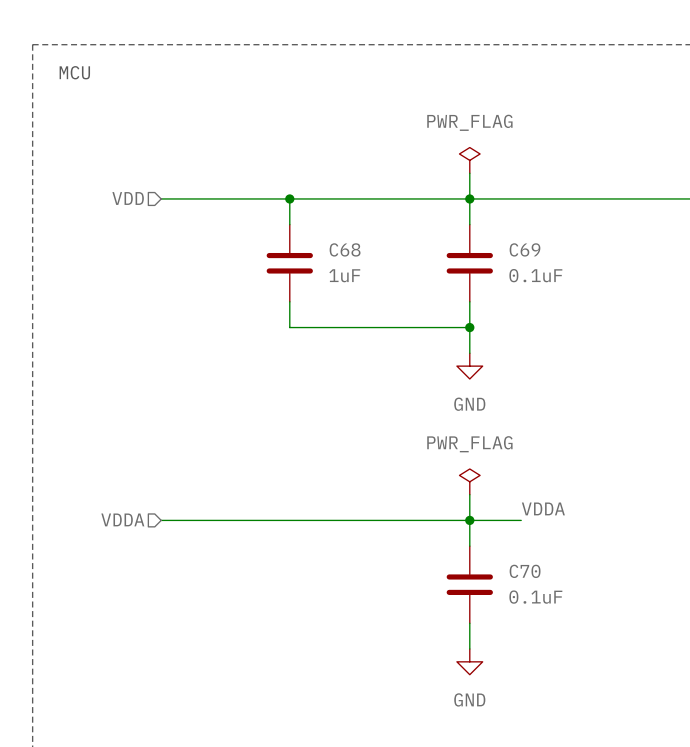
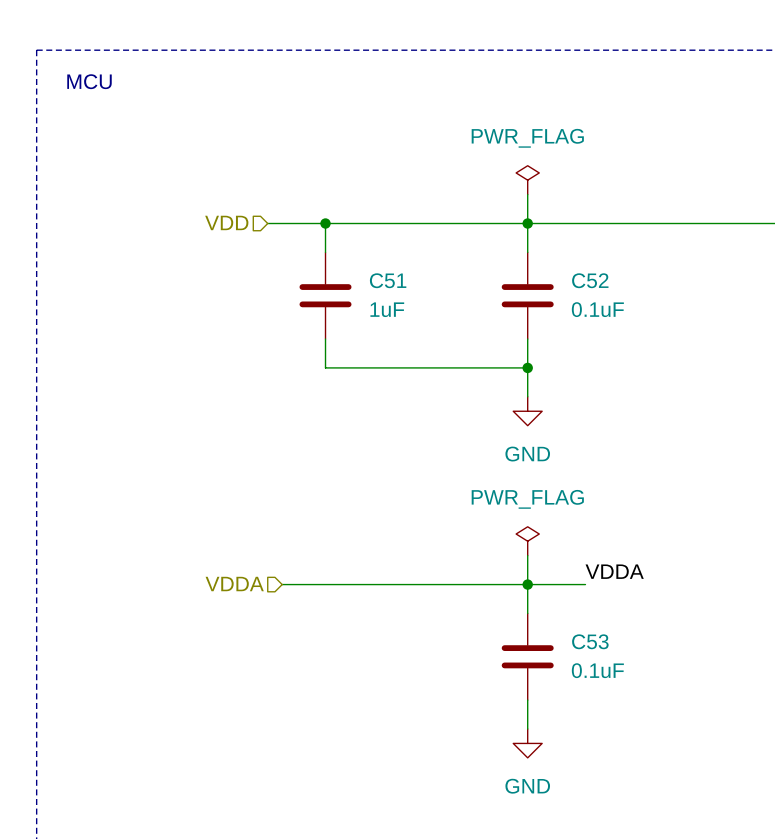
hierarchical label position: VDD (128, 198) -> VDD (226, 222)
wire: (161, 198) (238, 198) -> none
C68 name: C68 (345, 249) -> C51 (388, 280)
C69 name: C69 (525, 249) -> C52 (590, 280)
hierarchical label position: VDDA (122, 519) -> VDDA (234, 584)
wire: (161, 520) (251, 520) -> none
C70 name: C70 (525, 571) -> C53 (590, 641)

